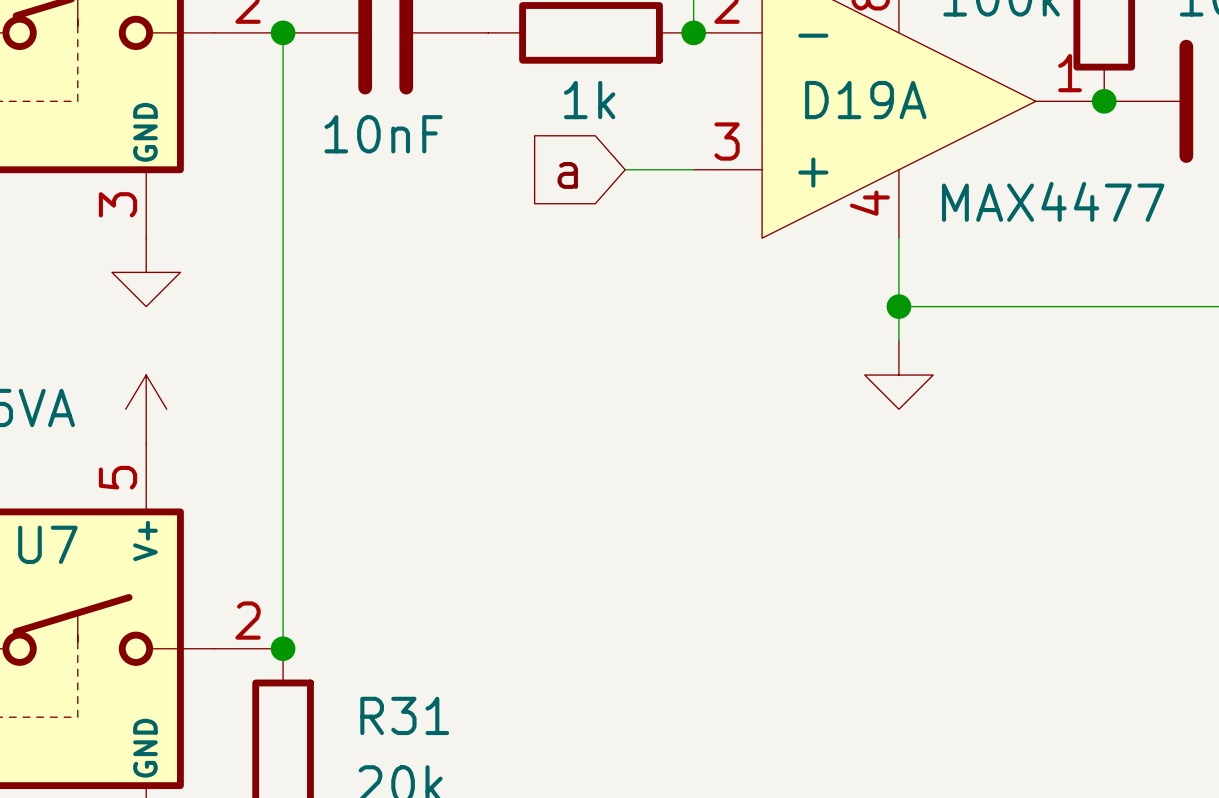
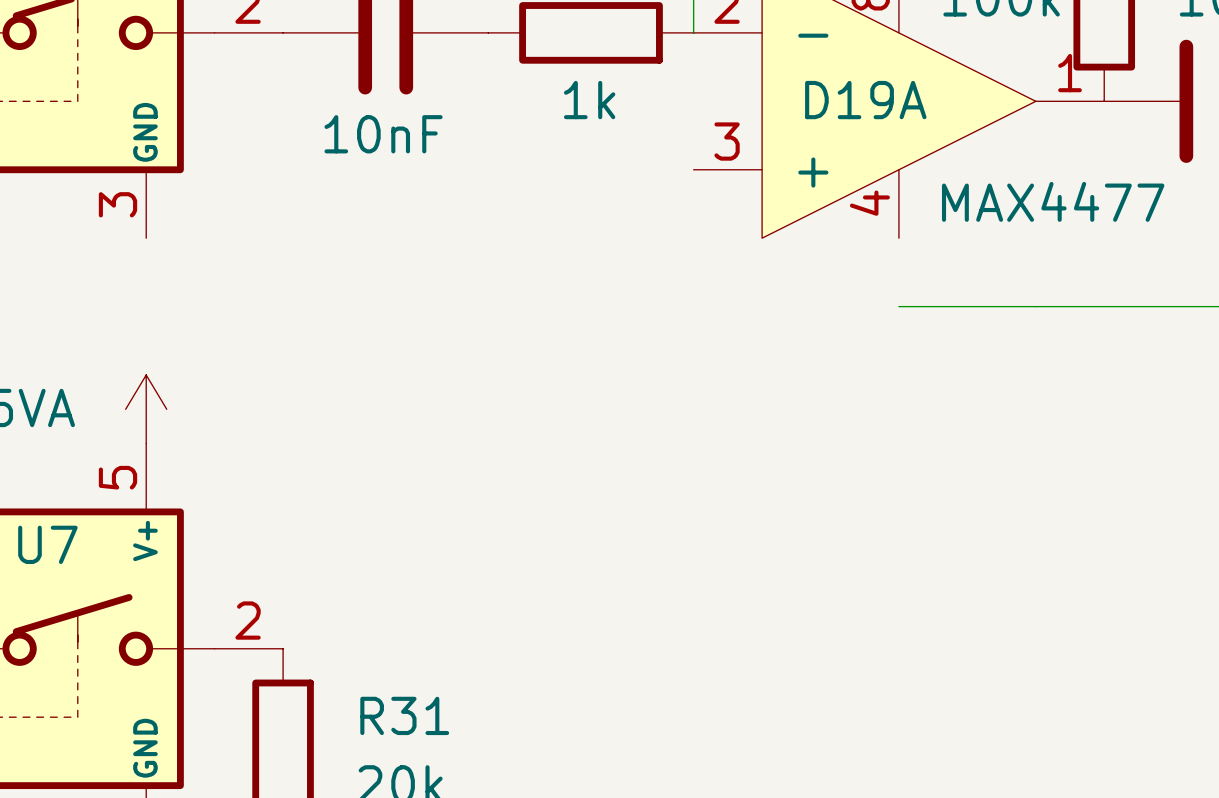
wire: (283, 32) (283, 648) -> none
junction: (283, 32) -> none
junction: (693, 32) -> none
junction: (1104, 101) -> none
wire: (625, 169) (693, 169) -> none
global label: a (567, 175) -> none
wire: (898, 238) (898, 340) -> none
power symbol: (146, 272) -> none
junction: (898, 306) -> none
power symbol: (898, 375) -> none
junction: (283, 648) -> none

